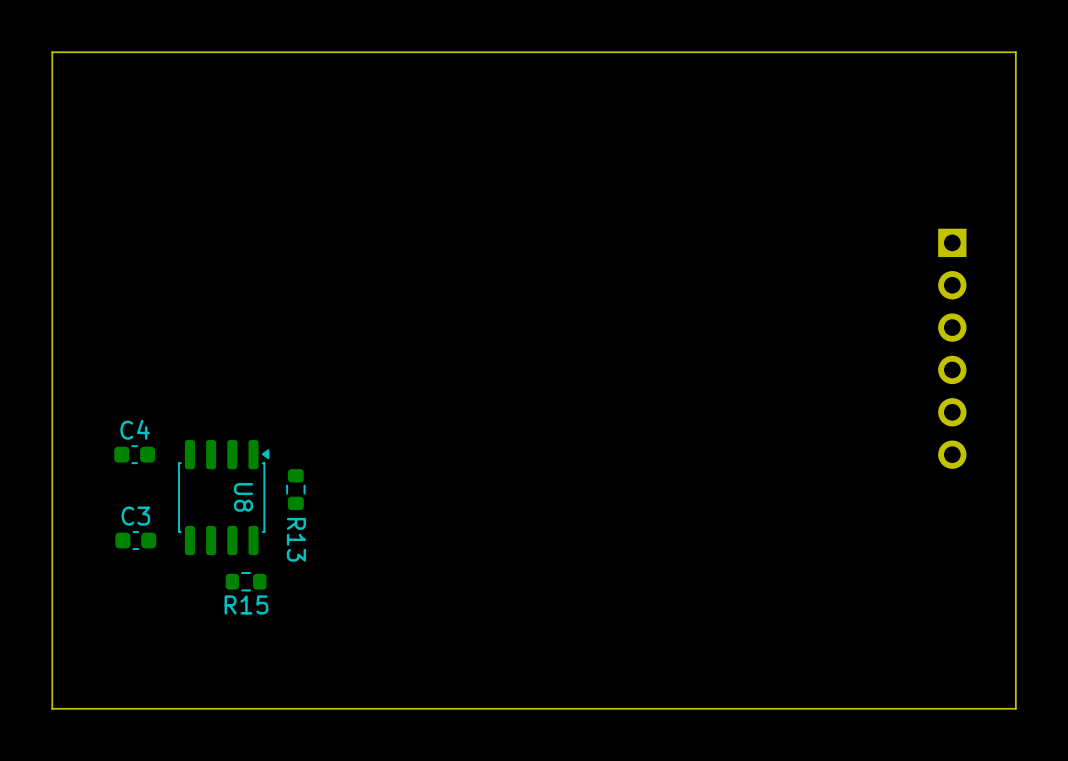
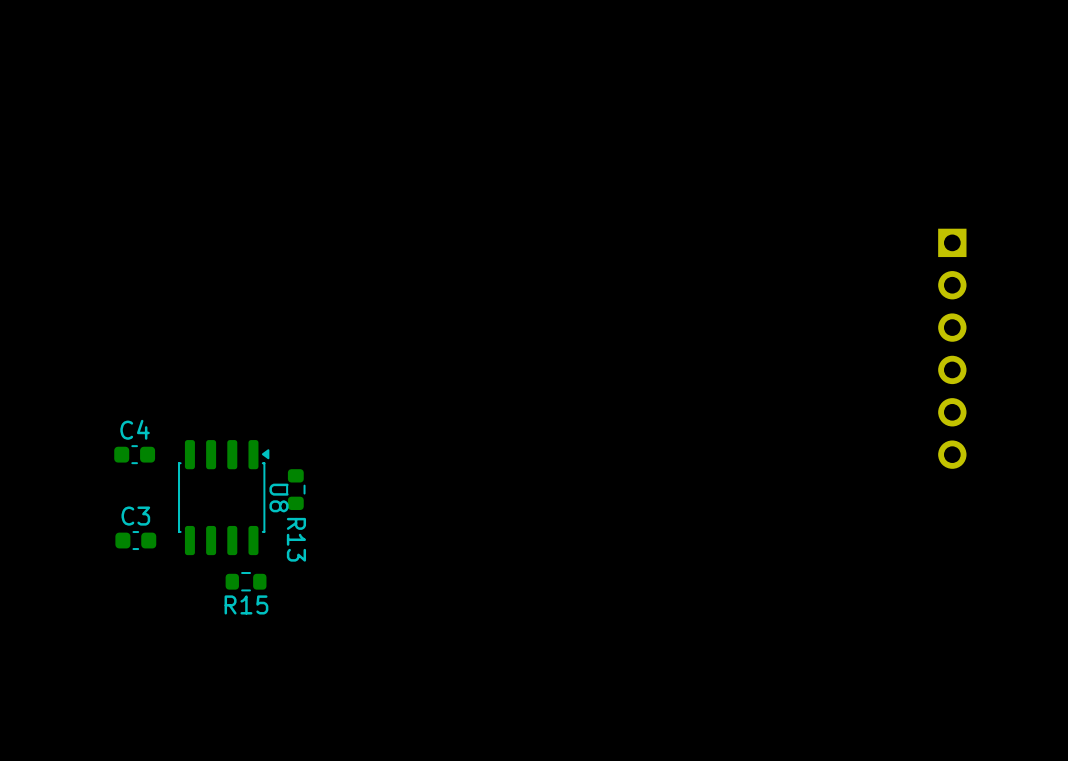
board edge: (1015, 52) (52, 52) (52, 708) (1015, 708) (1015, 52) -> none
U8 name position: U8 (243, 497) -> U8 (279, 497)

